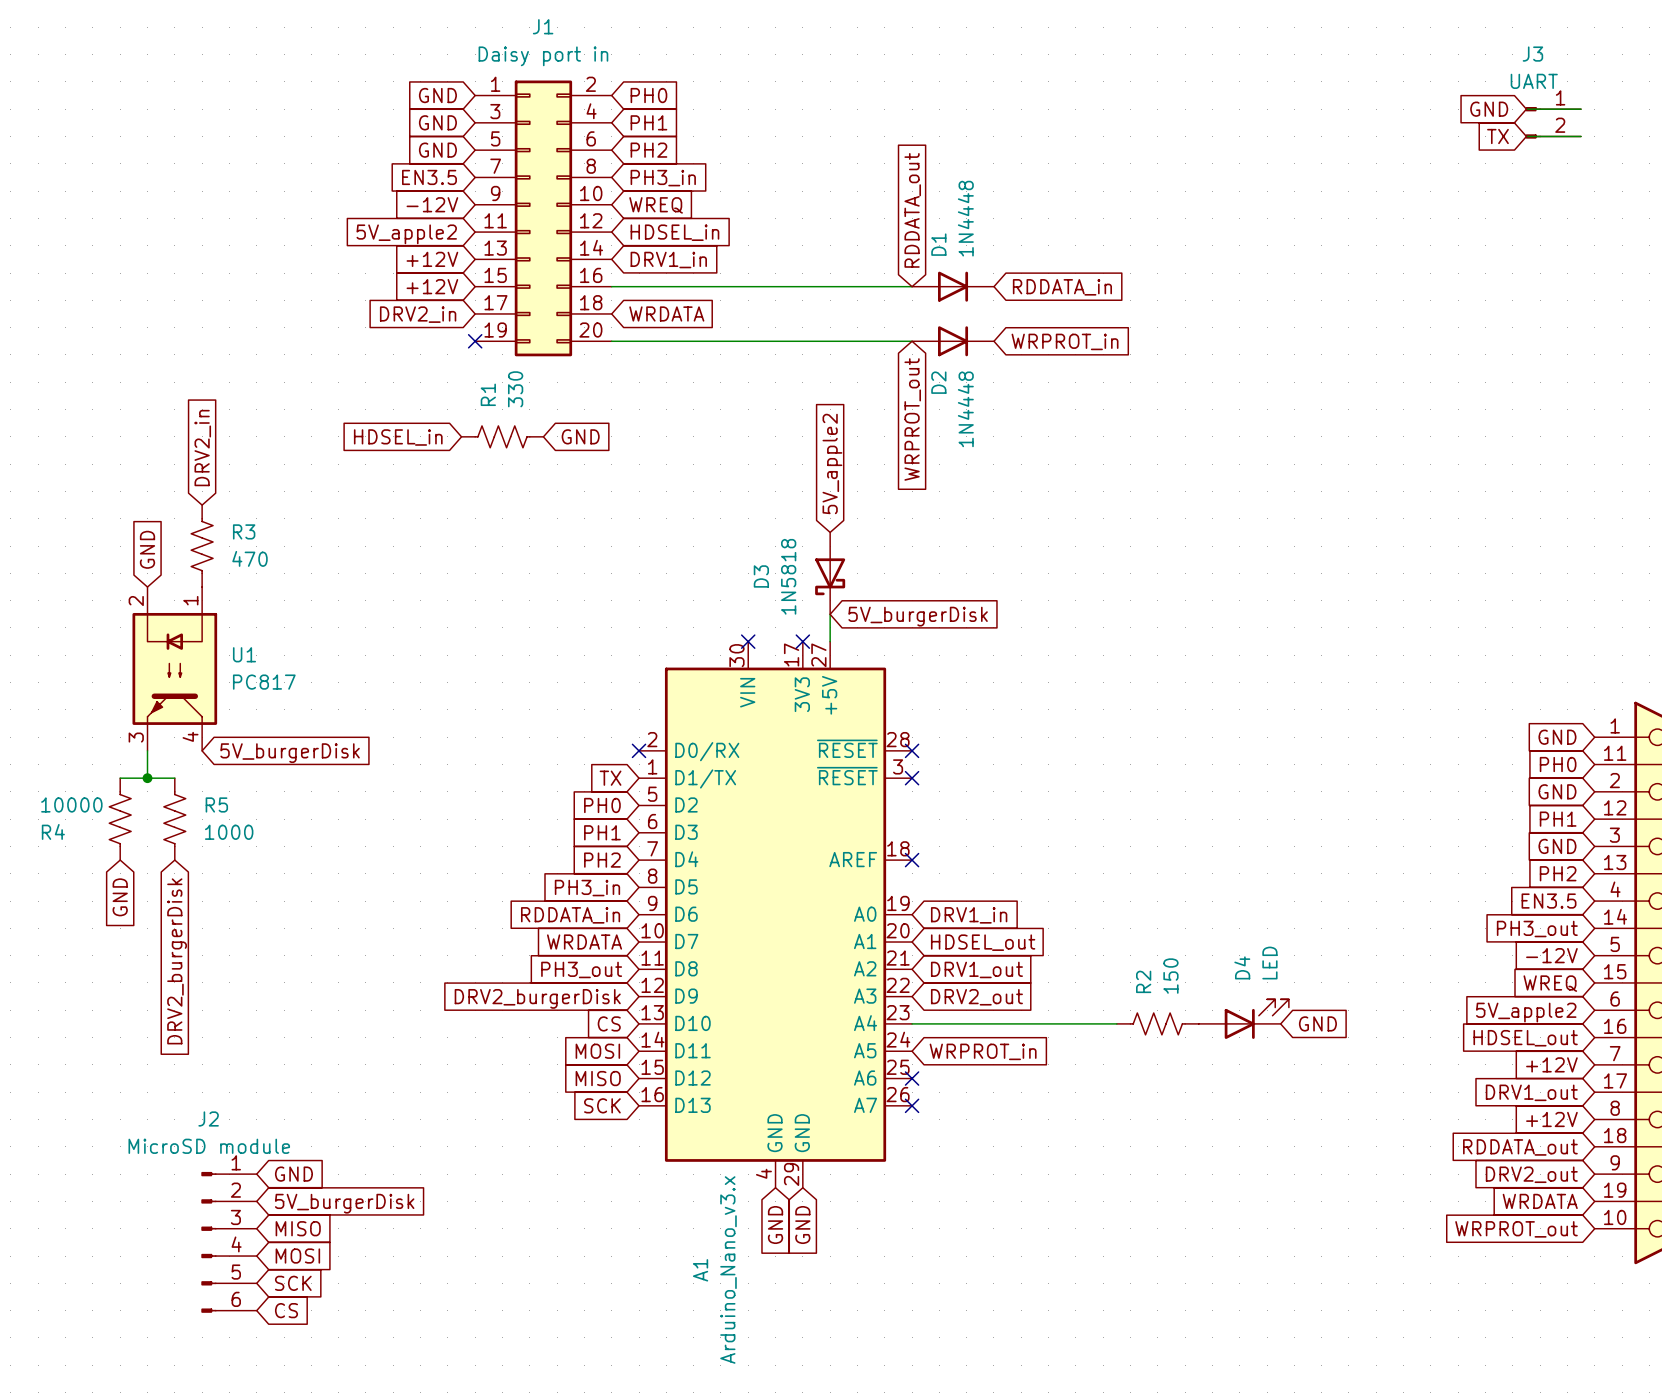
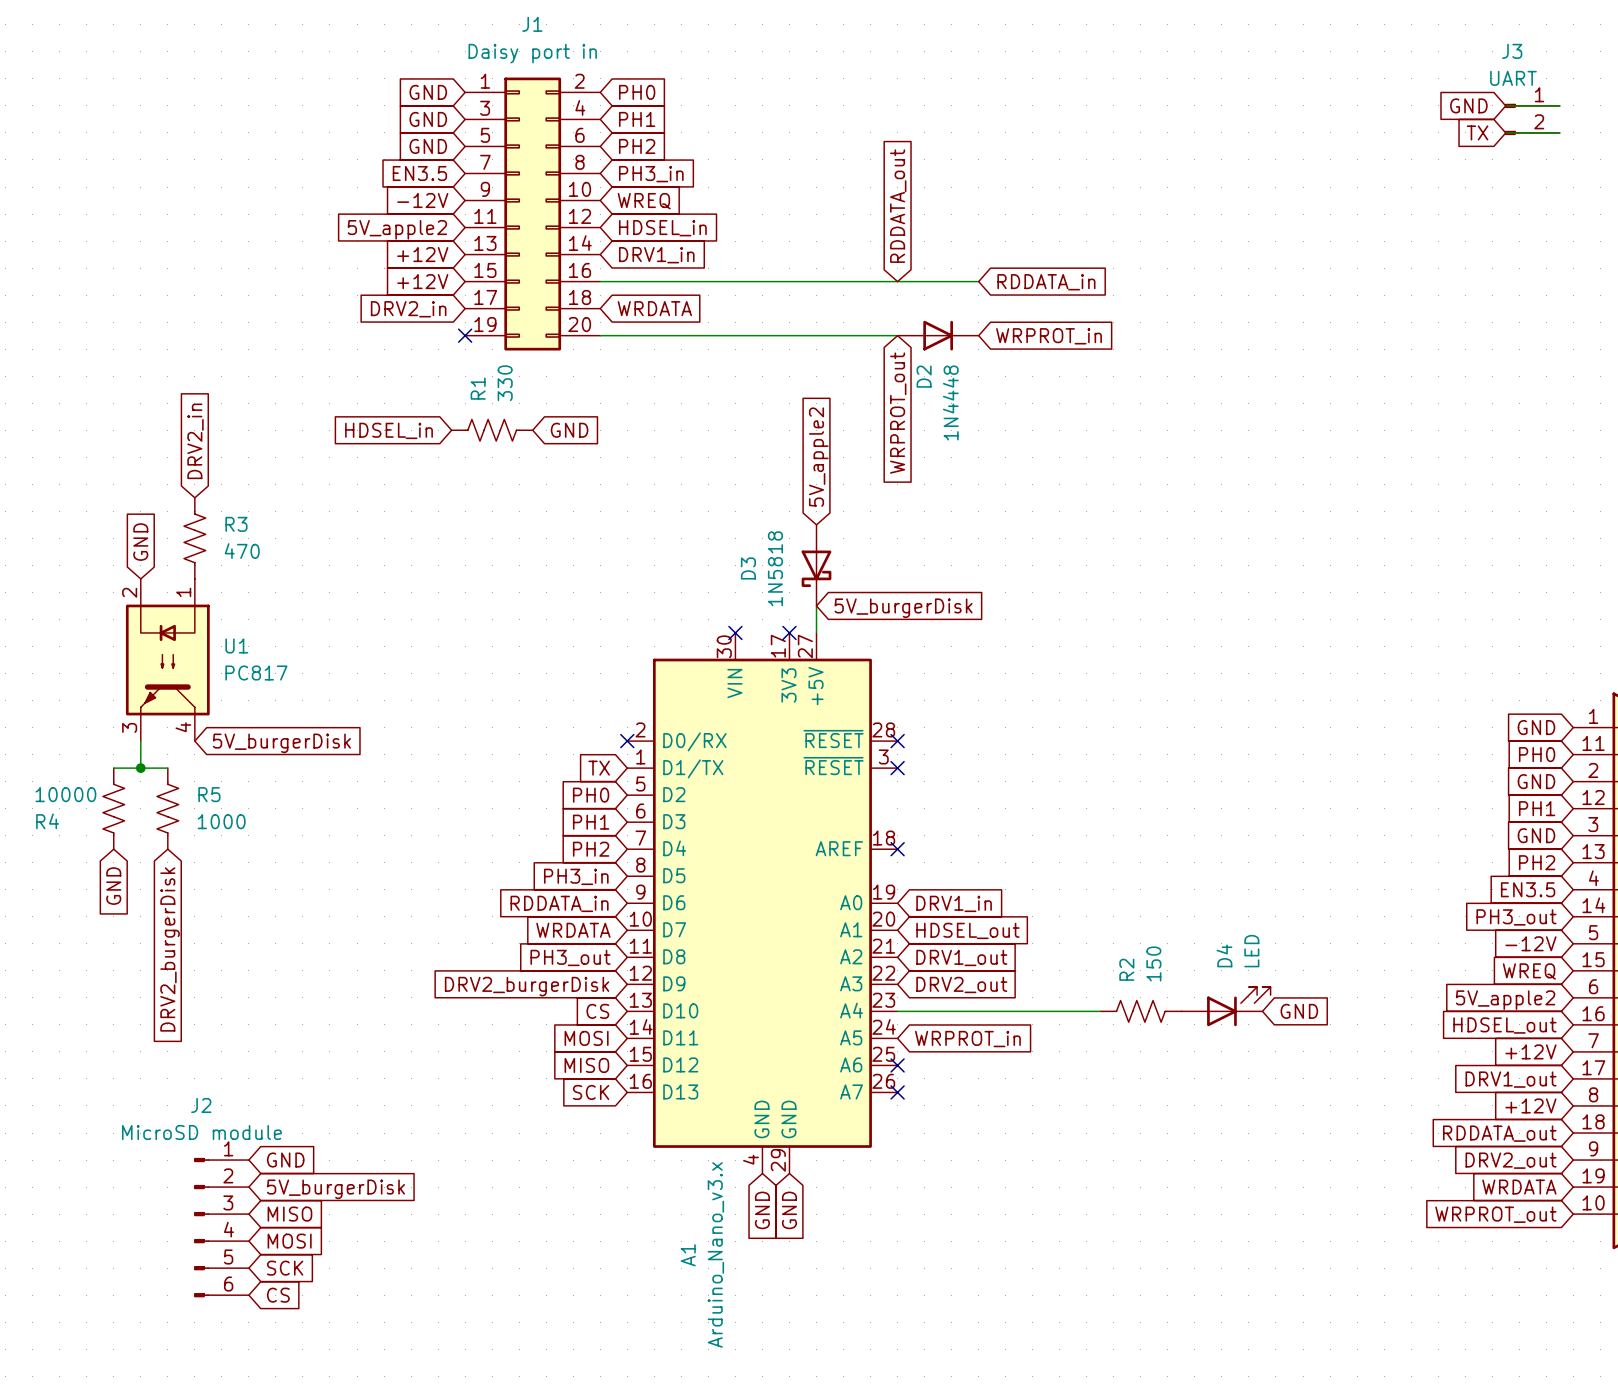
D1: 1N4448 (953, 286) -> none

